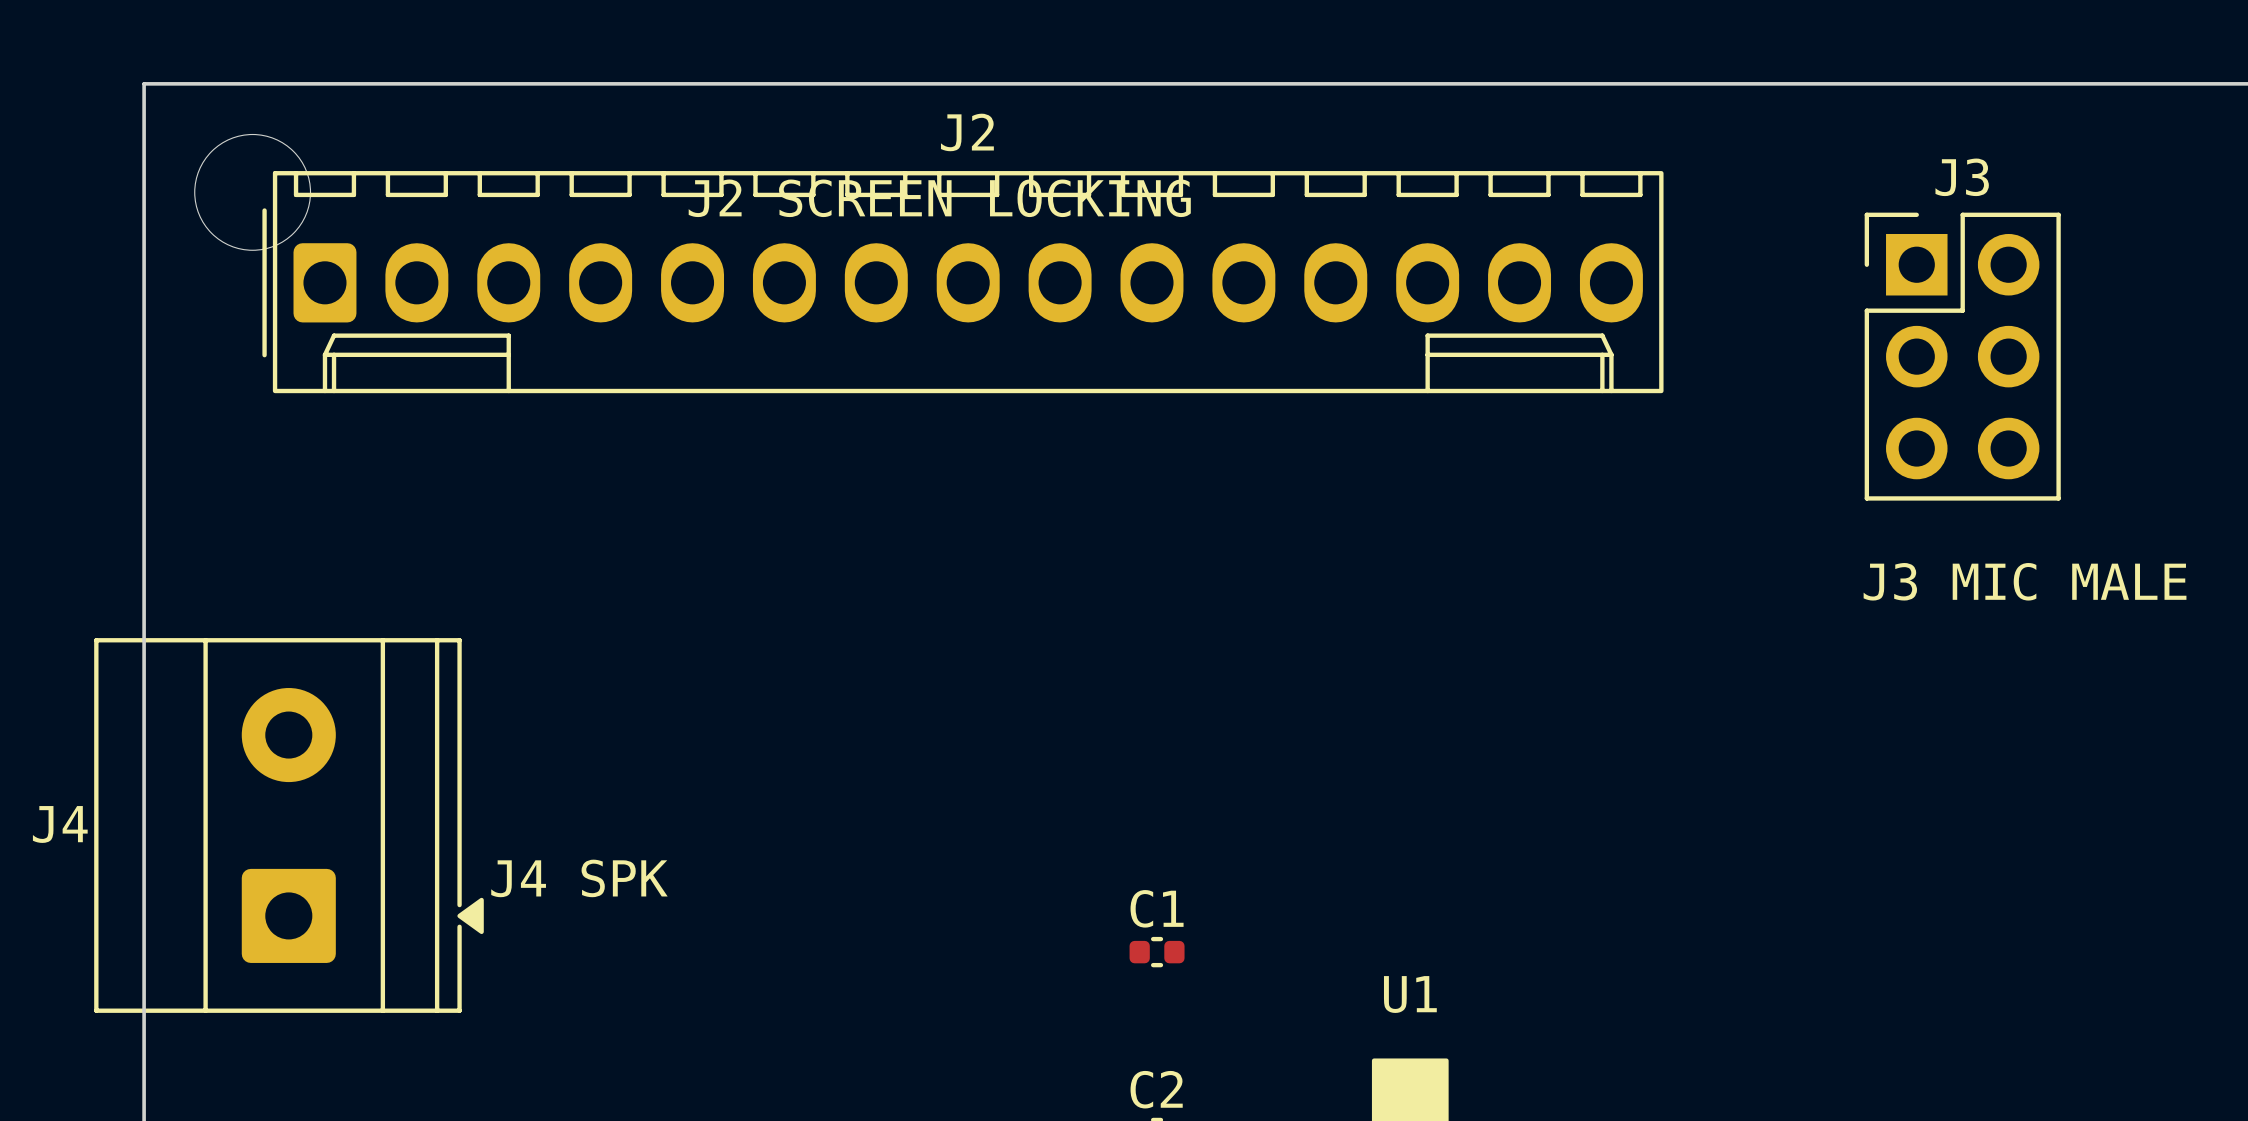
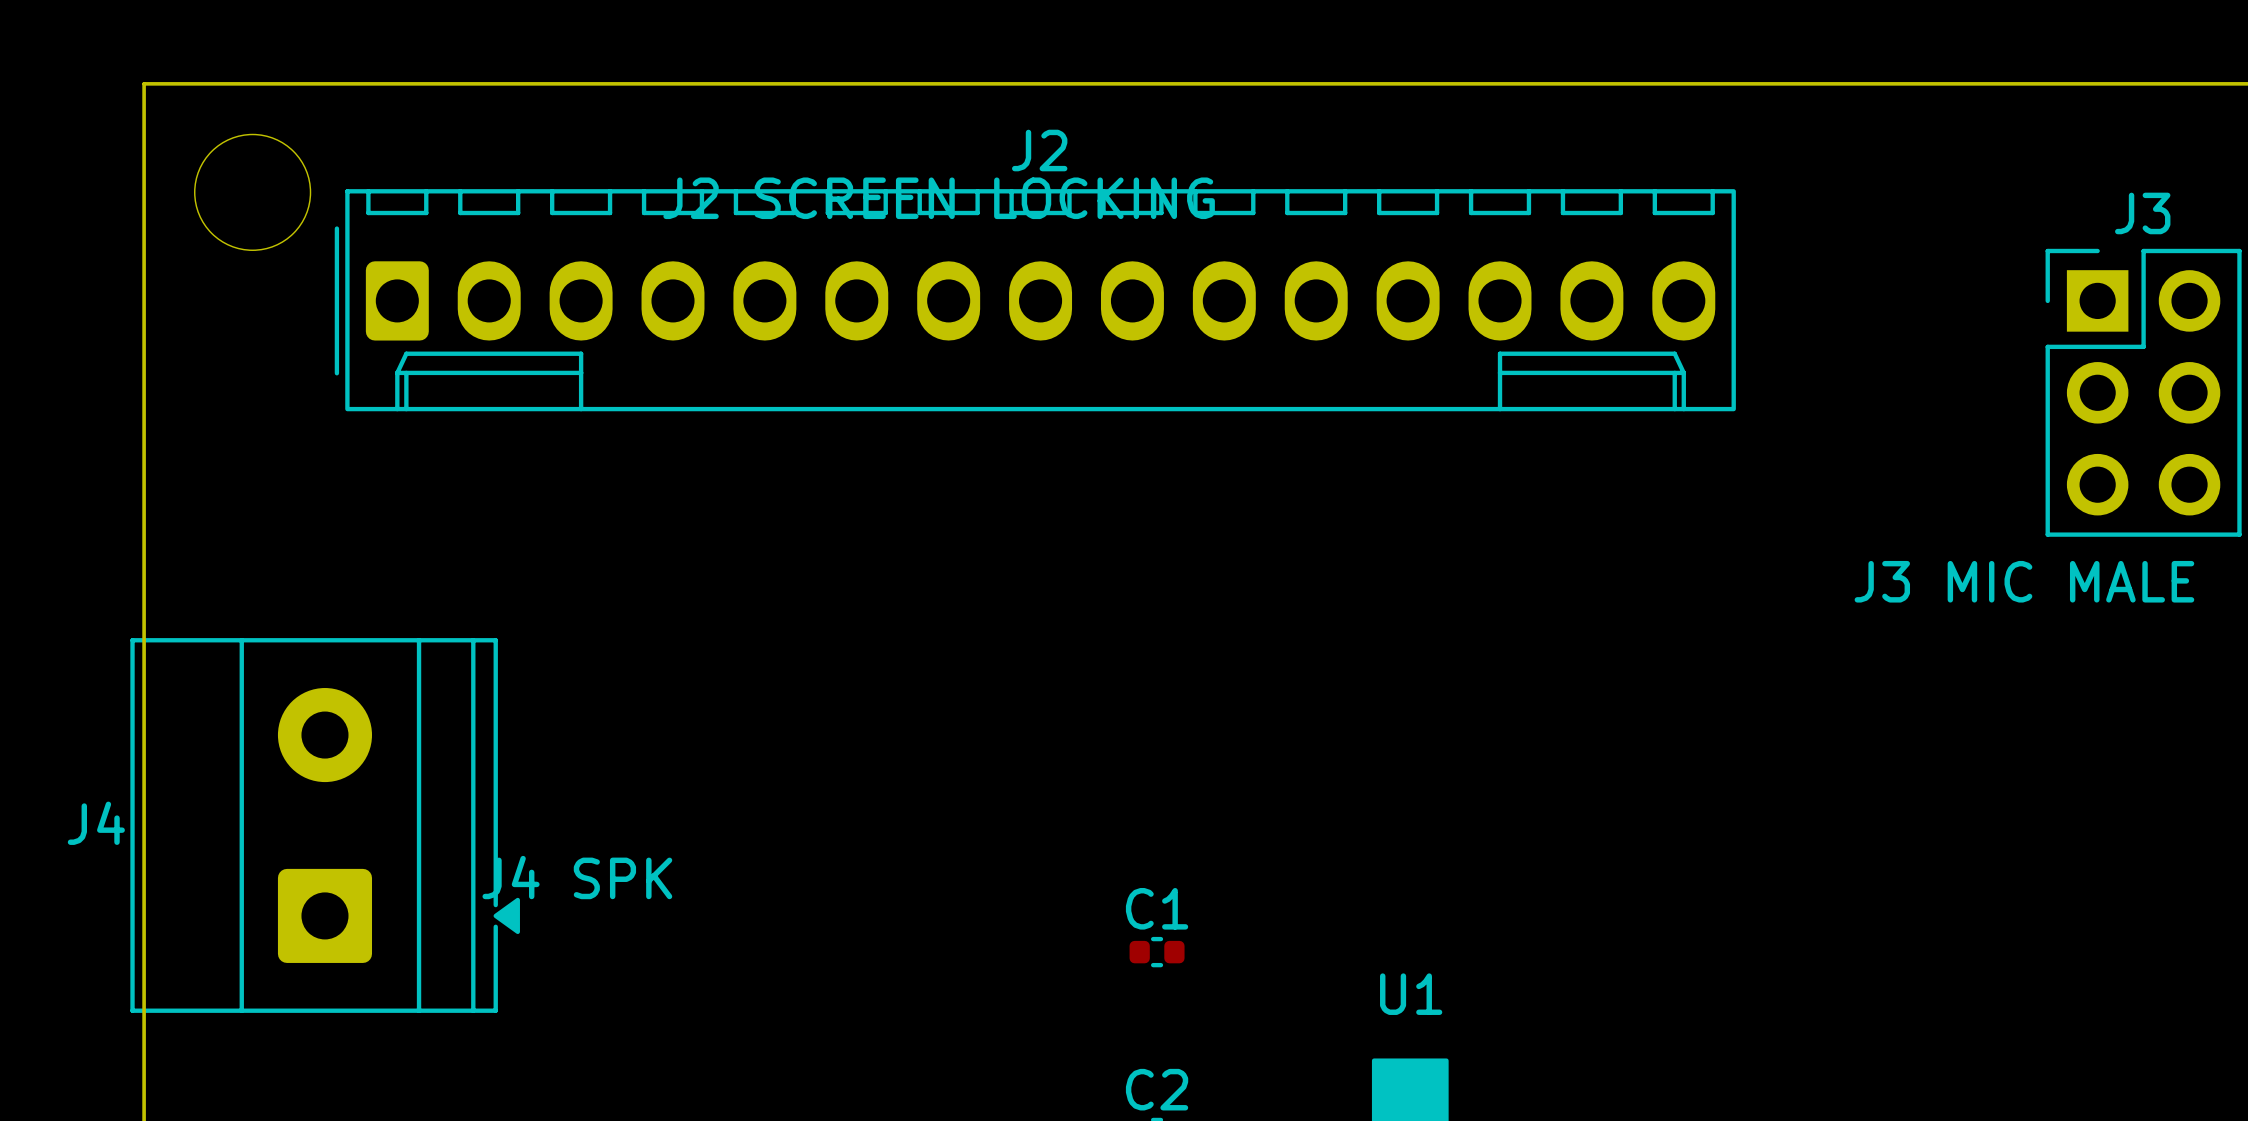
J2 position: (962, 282) -> (1035, 300)
J3 position: (1962, 356) -> (2143, 392)
J4 position: (288, 825) -> (325, 825)

